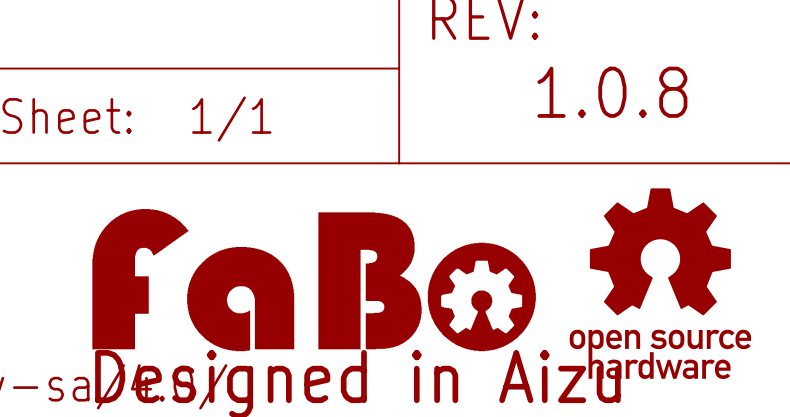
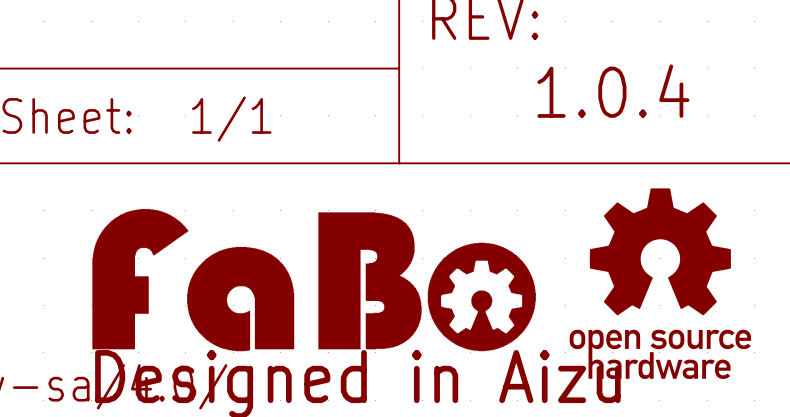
text: 1.0.8 (612, 92) -> 1.0.4 (613, 91)

